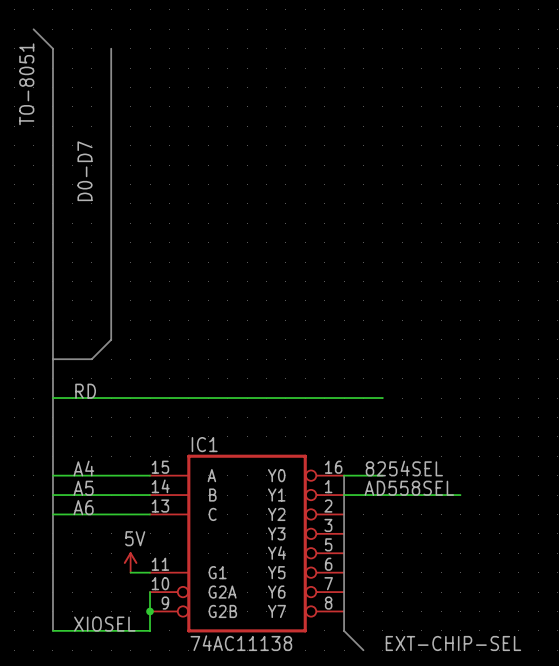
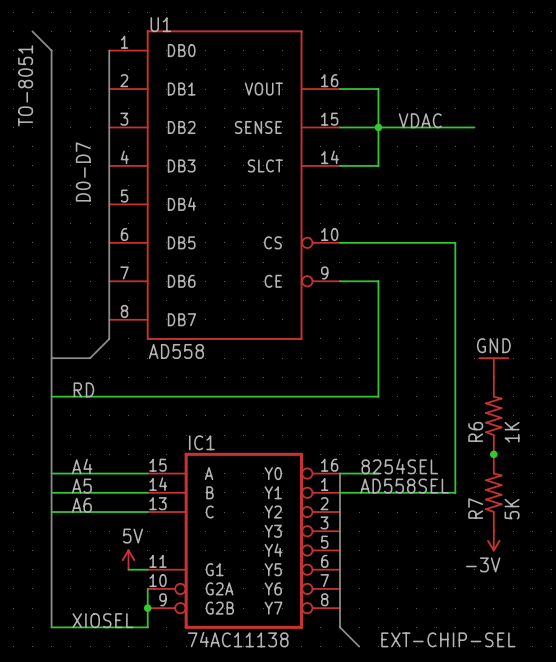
wire: none -> (339, 89) (378, 89) (378, 165) (339, 165)
label: none -> VDAC (420, 120)
wire: none -> (339, 127) (474, 127)
junction: none -> (378, 127)
U1: none -> AD558 (224, 185)
wire: none -> (339, 242) (455, 242) (455, 492)
wire: none -> (339, 281) (378, 281) (378, 396)
power symbol: none -> GND (493, 367)
R6: none -> 1K (493, 415)
junction: none -> (493, 454)
R7: none -> 5K (493, 492)
power symbol: none -> -3V (493, 541)

